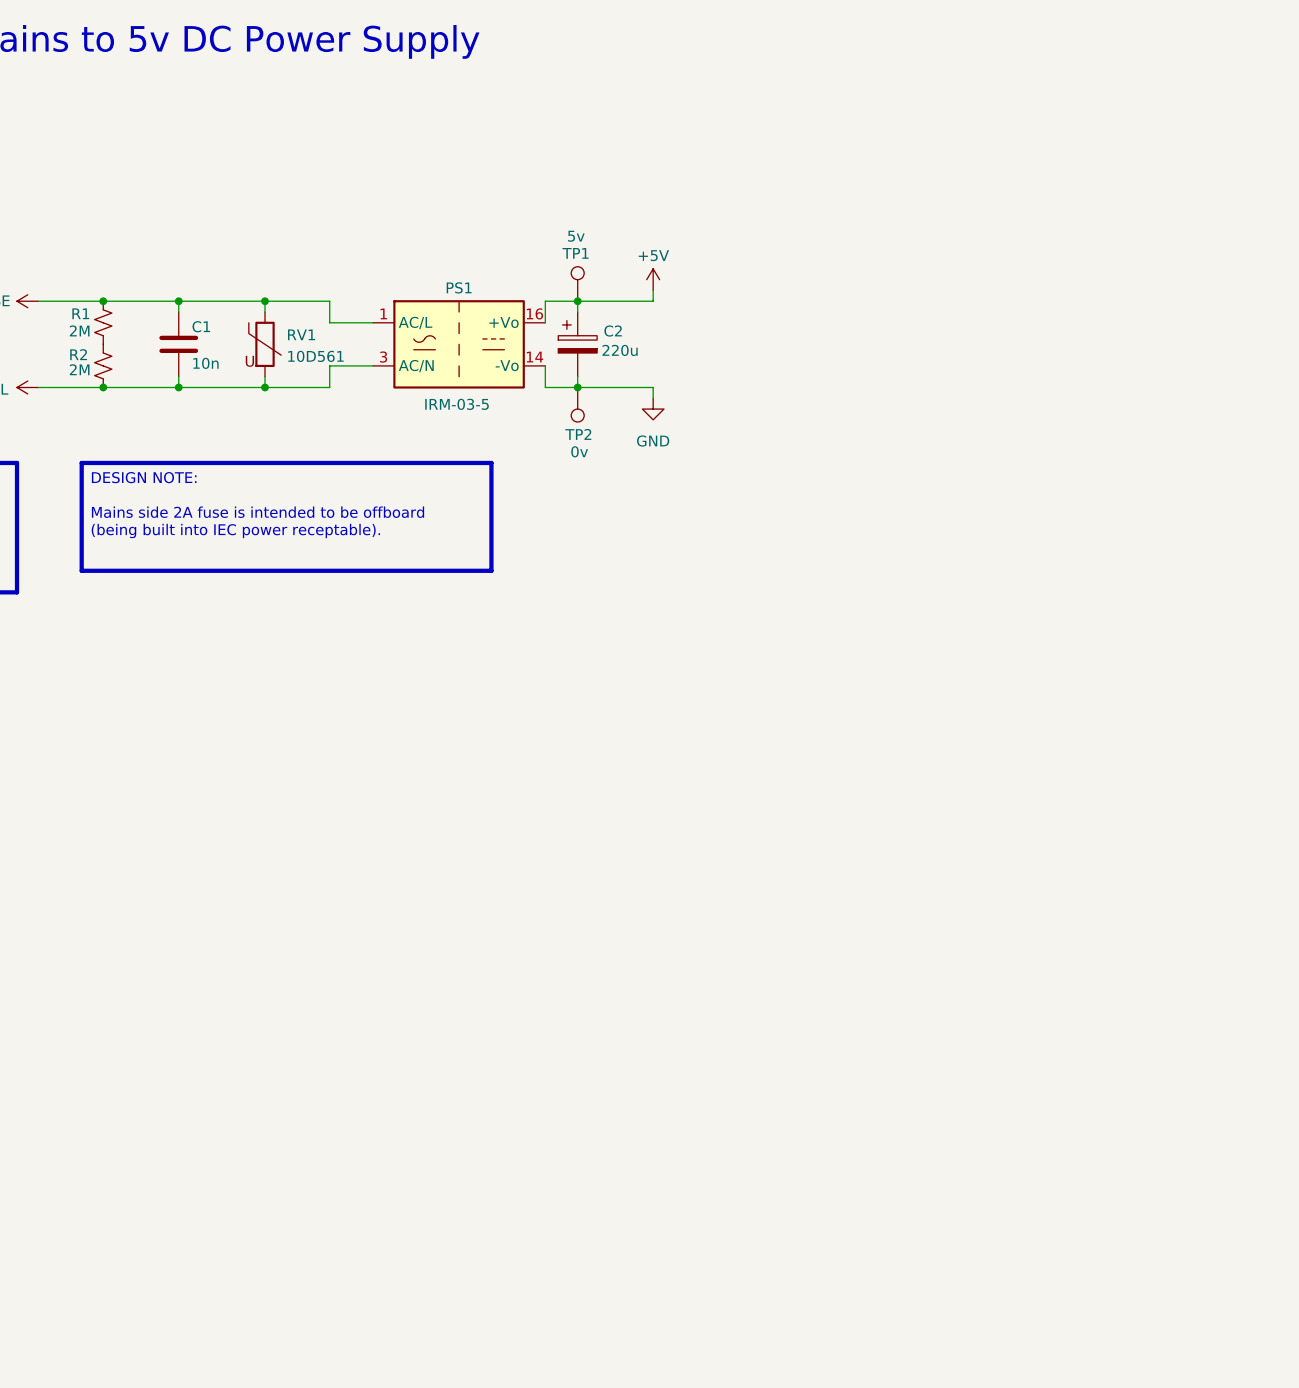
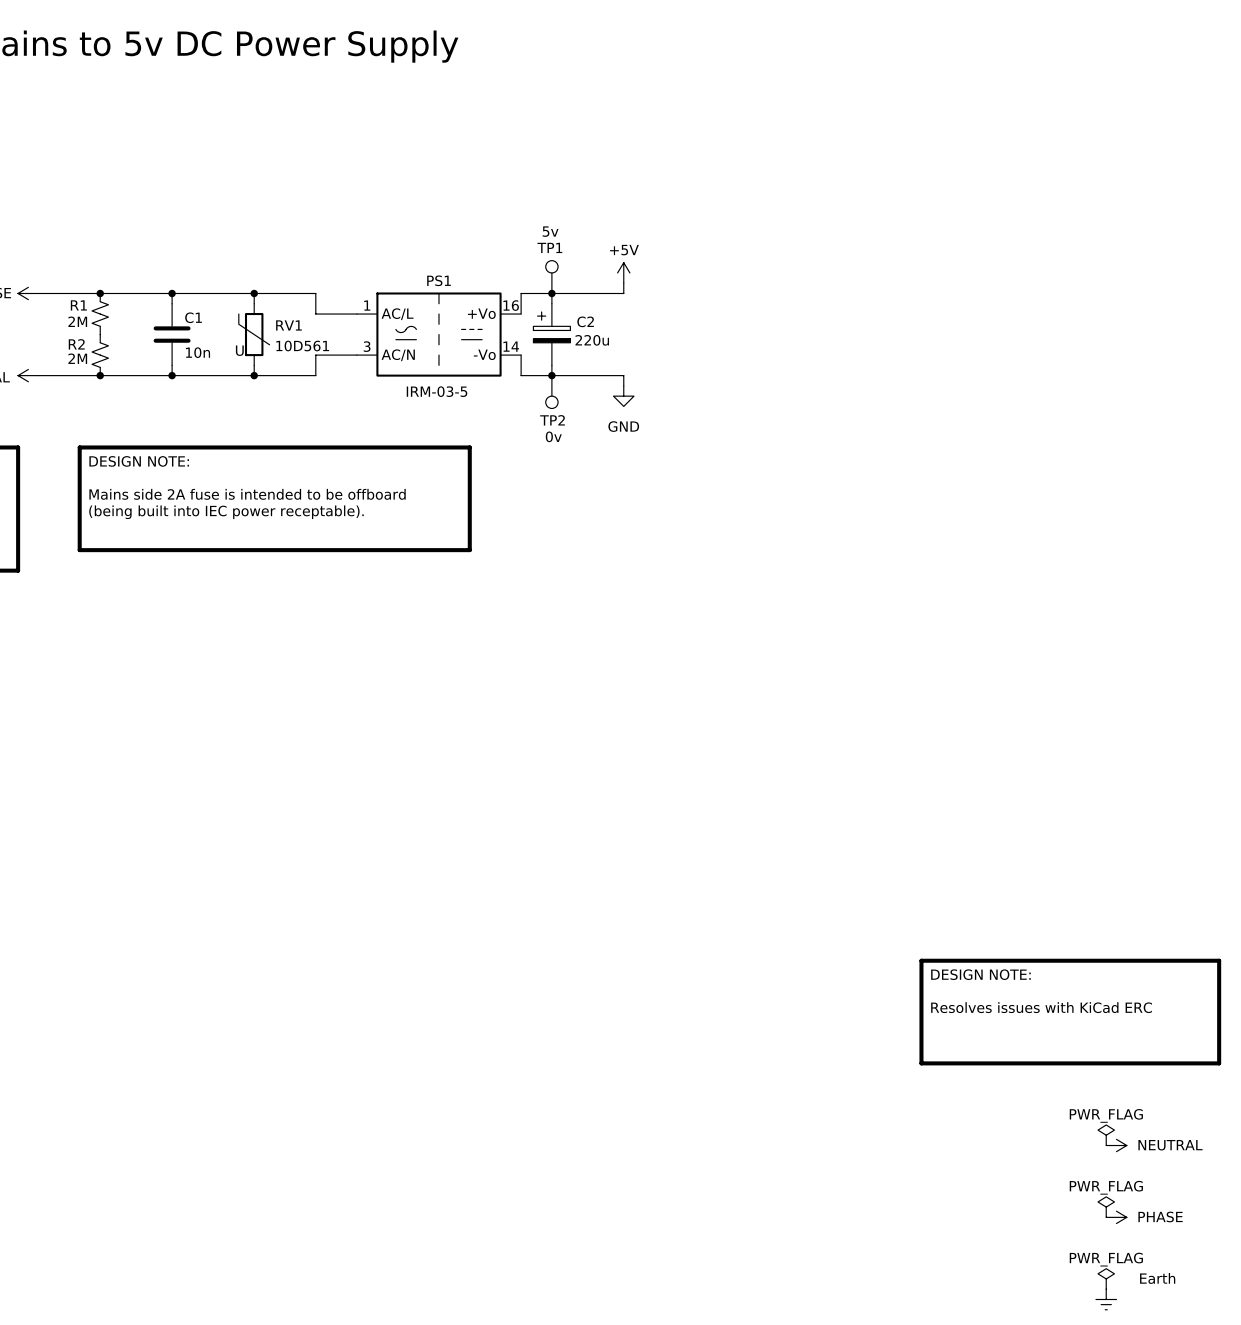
line: none -> (921, 960) (1219, 960) (1219, 1063) (921, 1063) (921, 960)
text: none -> DESIGN NOTE: (980, 974)
text: none -> Resolves issues with KiCad ERC (1041, 1007)
power symbol: none -> PWR_FLAG (1106, 1135)
power symbol: none -> NEUTRAL (1116, 1145)
power symbol: none -> PWR_FLAG (1106, 1207)
power symbol: none -> PHASE (1116, 1217)
power symbol: none -> PWR_FLAG (1106, 1278)
power symbol: none -> Earth (1106, 1299)

